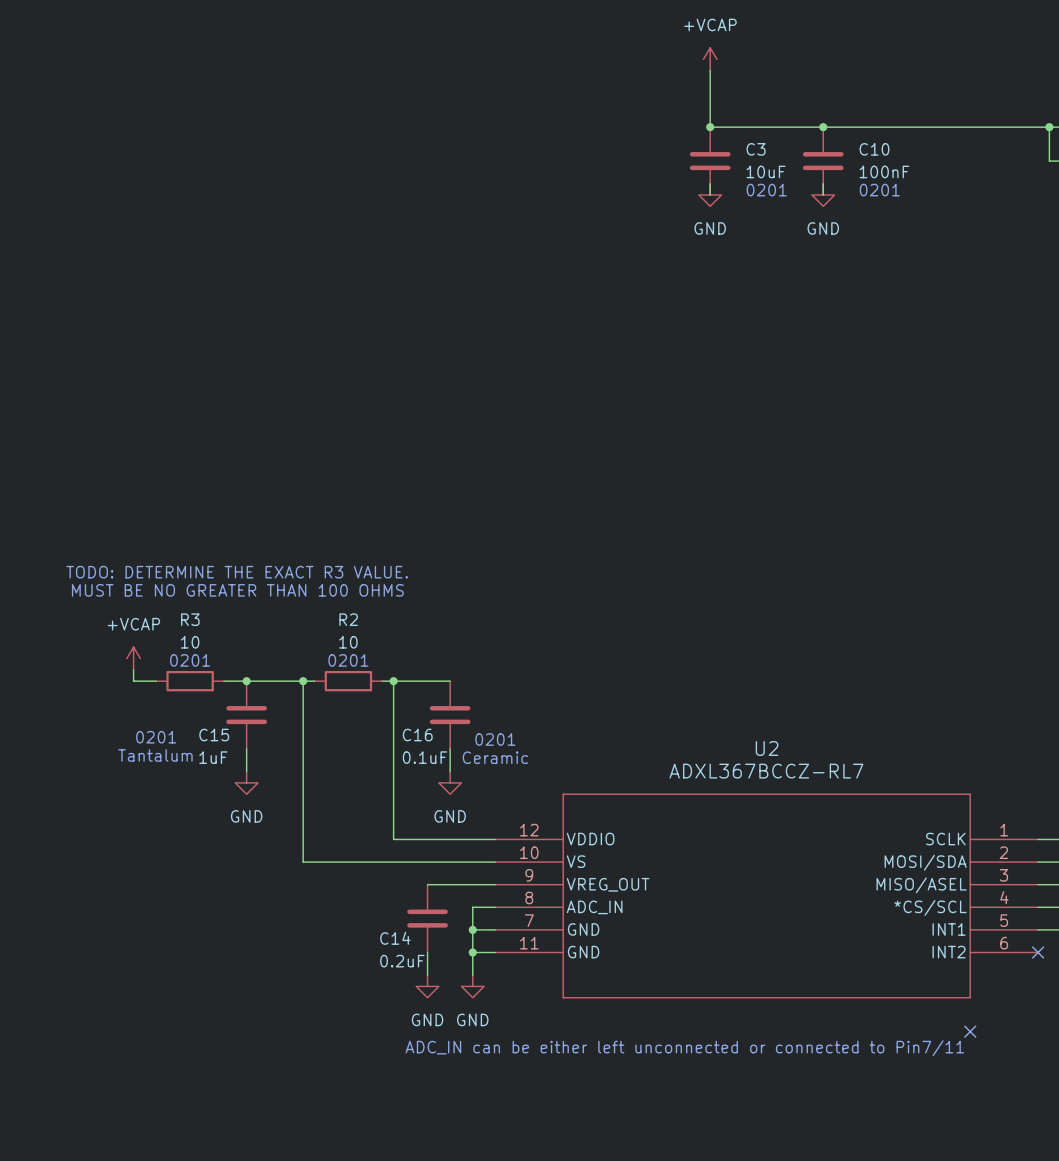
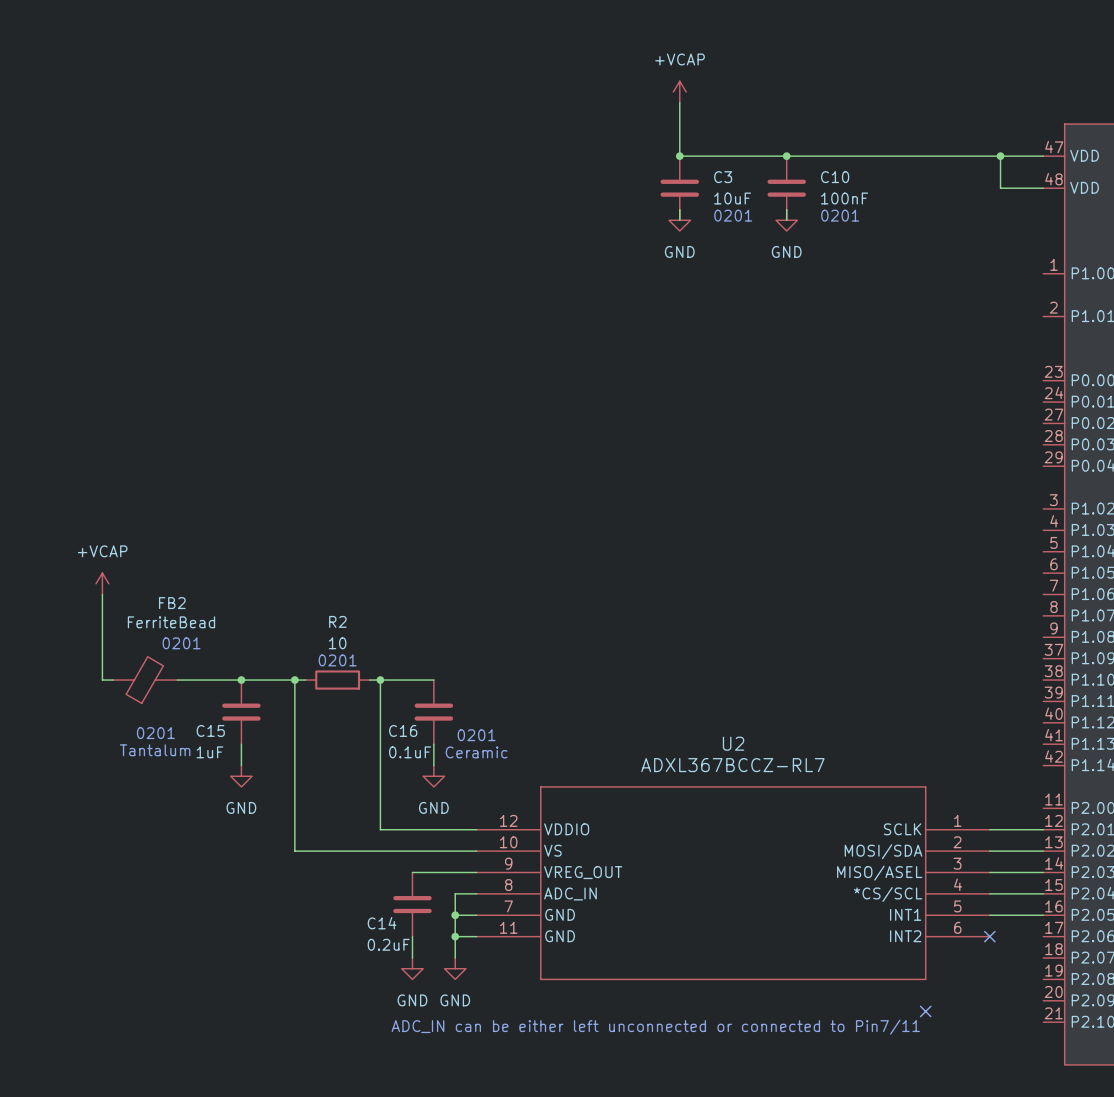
text: TODO: DETERMINE THE EXACT R3 VALUE. (237, 572) -> none
wire: none -> (102, 594) (102, 680) (113, 680)
text: MUST BE NO GREATER THAN 100 OHMS (237, 590) -> none
power symbol position: +VCAP (133, 658) -> +VCAP (102, 583)
text position: 0201 (190, 660) -> 0201 (181, 643)
wire: (133, 669) (133, 681) (156, 681) -> none
FB2: none -> FerriteBead (145, 680)
wire: none -> (177, 680) (220, 680)
R3: 10 (190, 681) -> none

